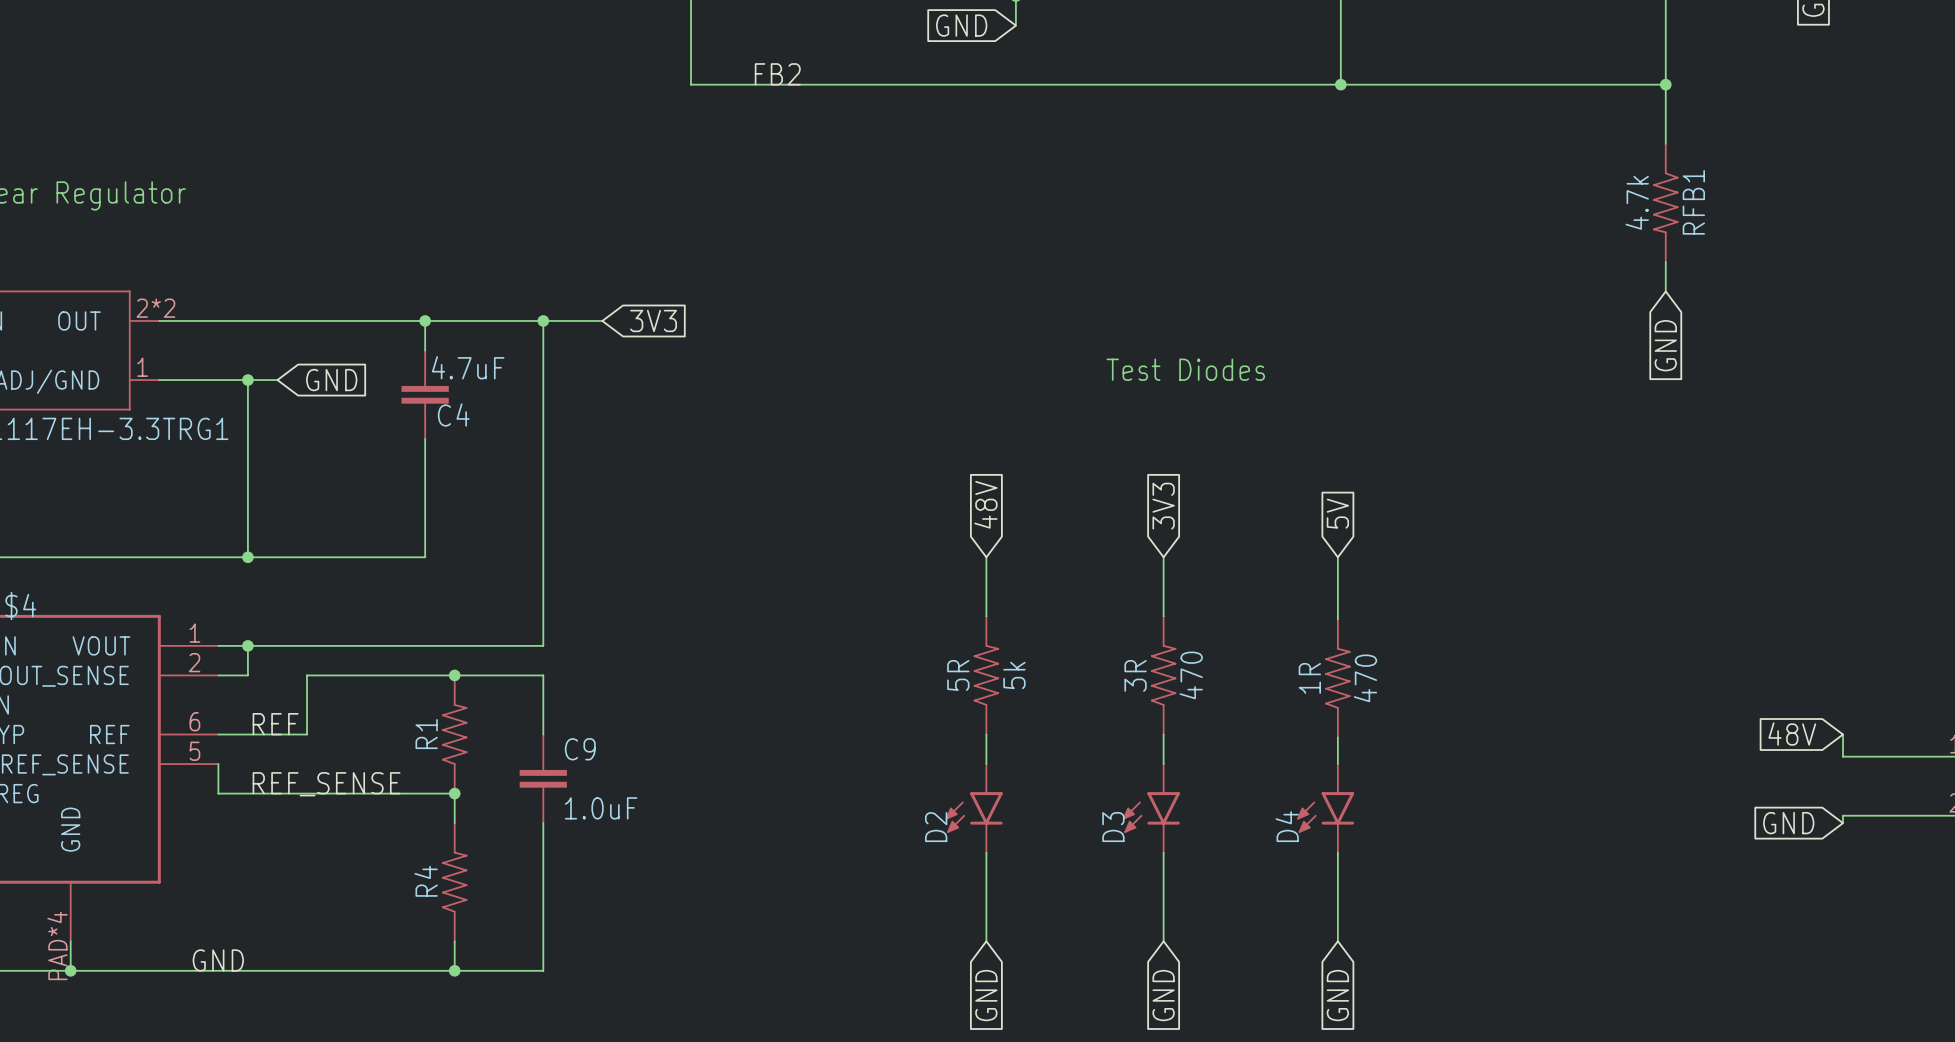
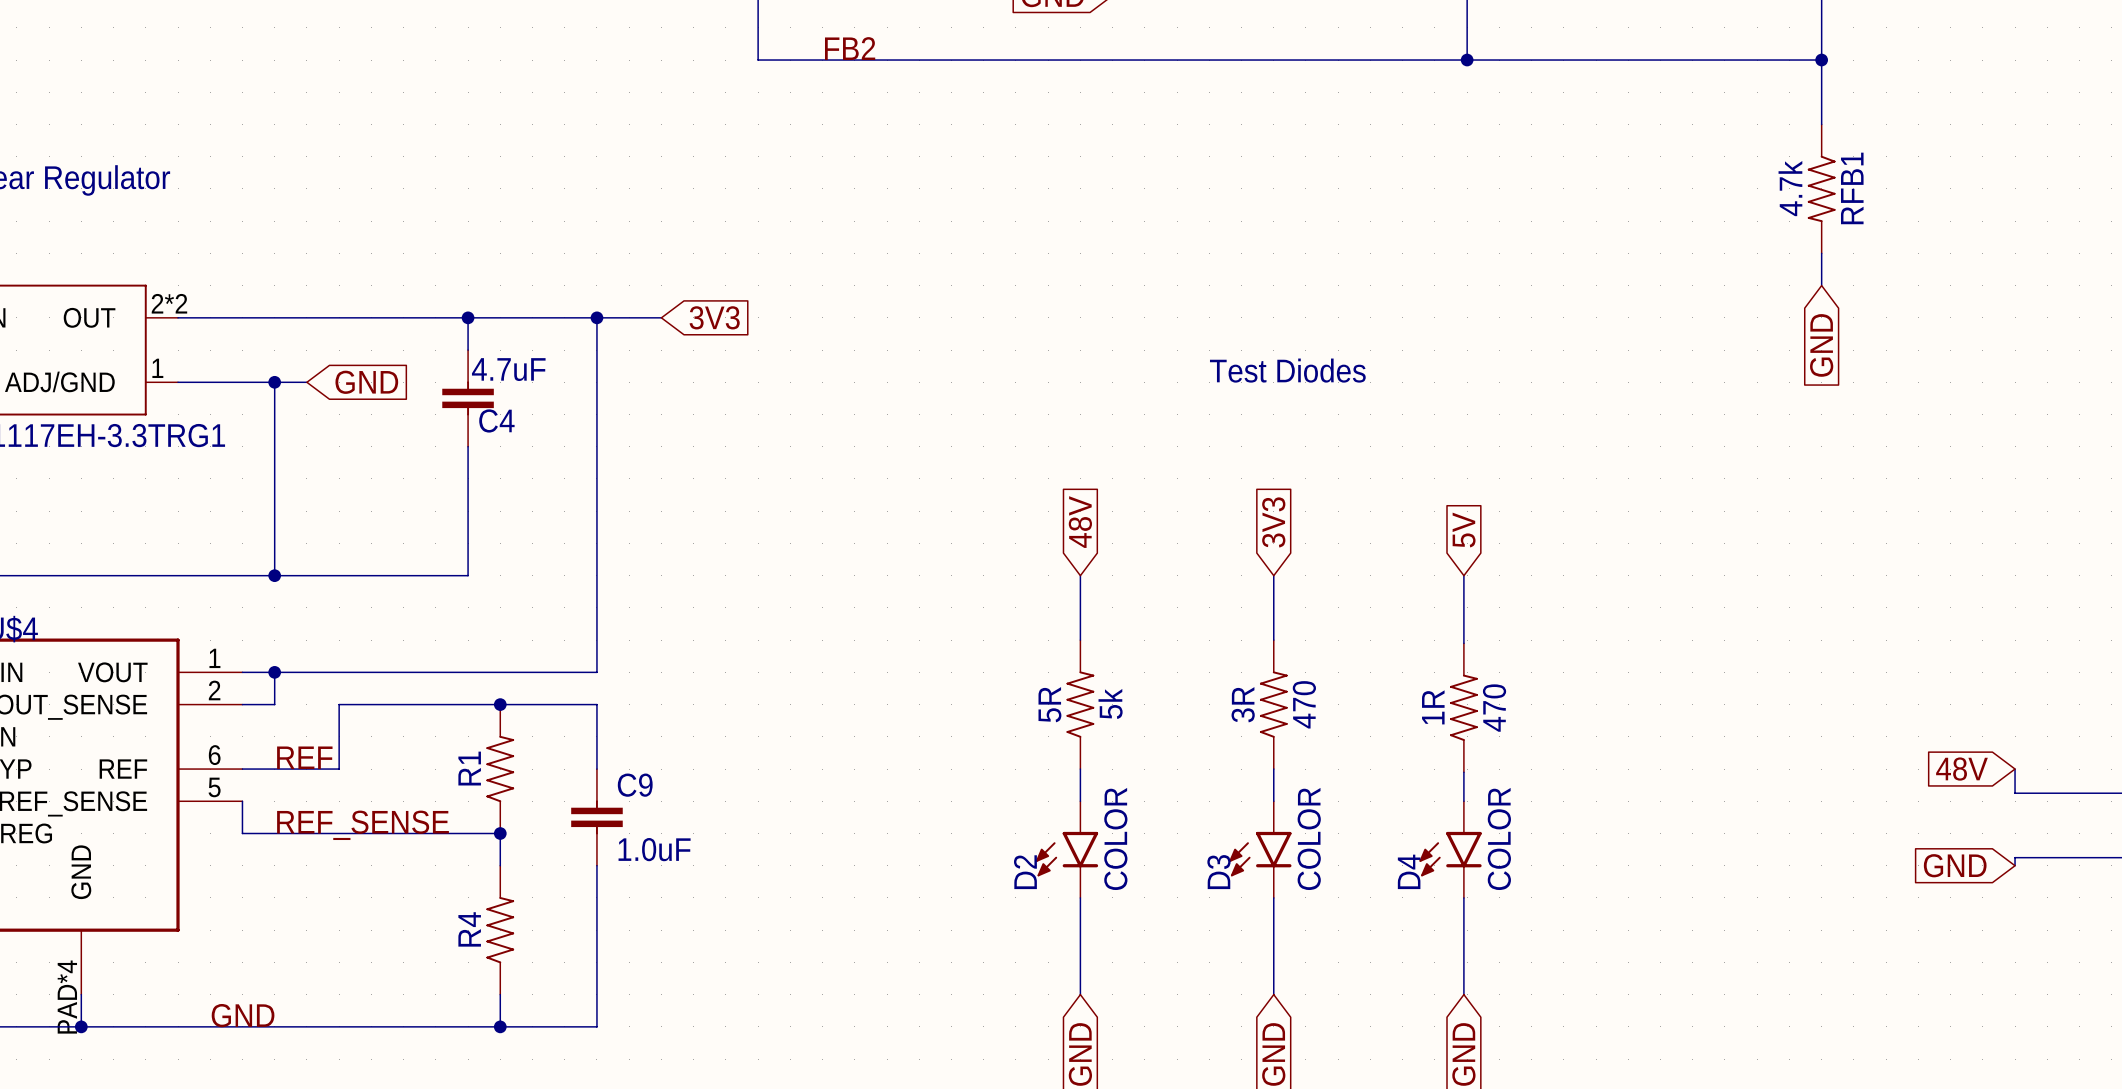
D2 value: none -> COLOR (1115, 838)
D3 value: none -> COLOR (1309, 838)
D4 value: none -> COLOR (1499, 838)

